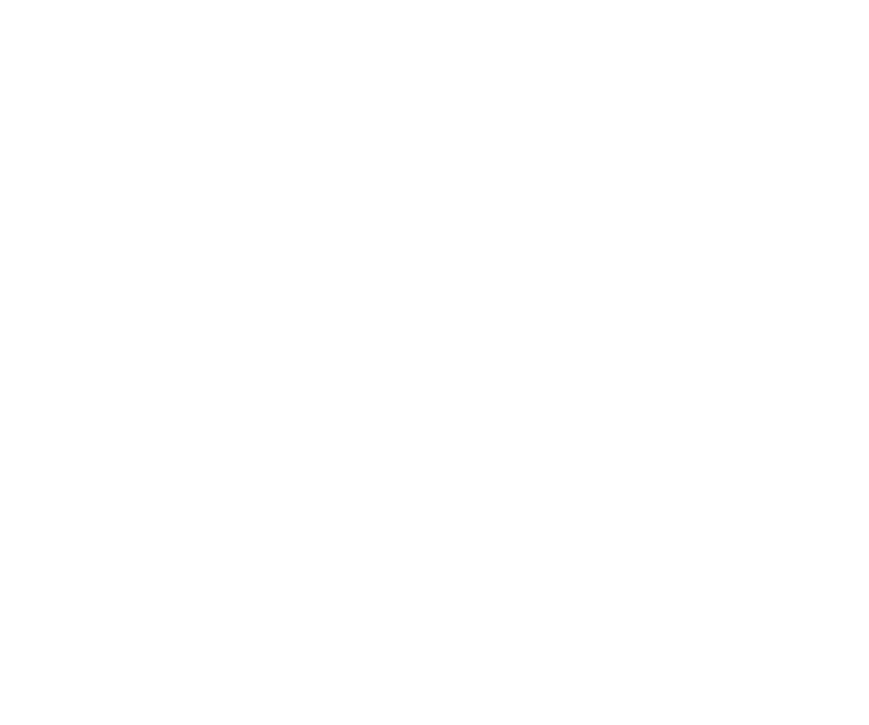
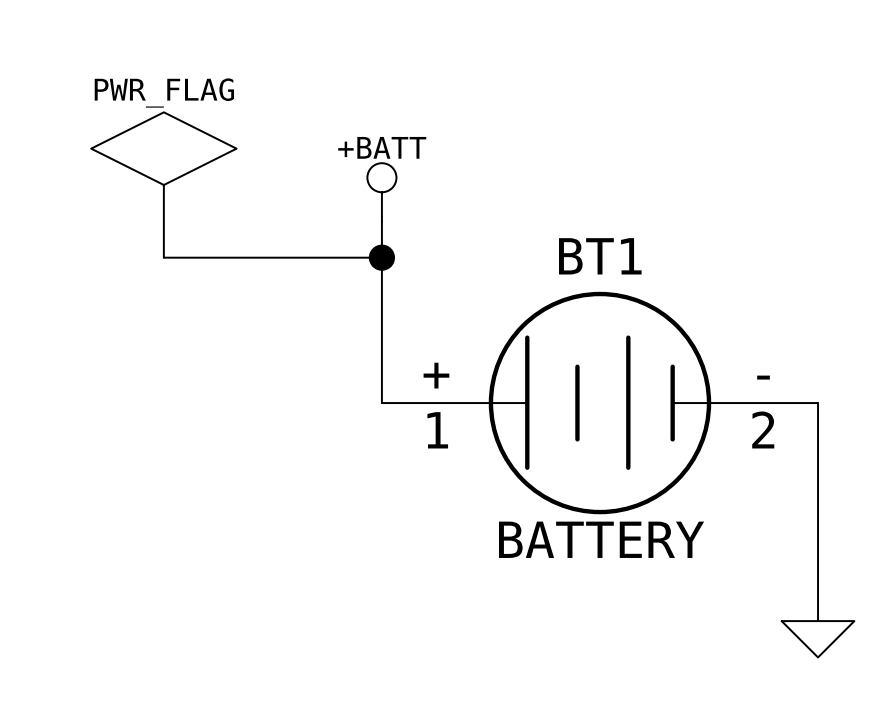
power symbol: none -> PWR_FLAG (163, 184)
power symbol: none -> +BATT (381, 192)
wire: none -> (381, 221) (381, 403)
wire: none -> (163, 257) (381, 257)
junction: none -> (381, 257)
BT1: none -> BATTERY (599, 403)
wire: none -> (818, 403) (818, 621)
power symbol: none -> (818, 639)

